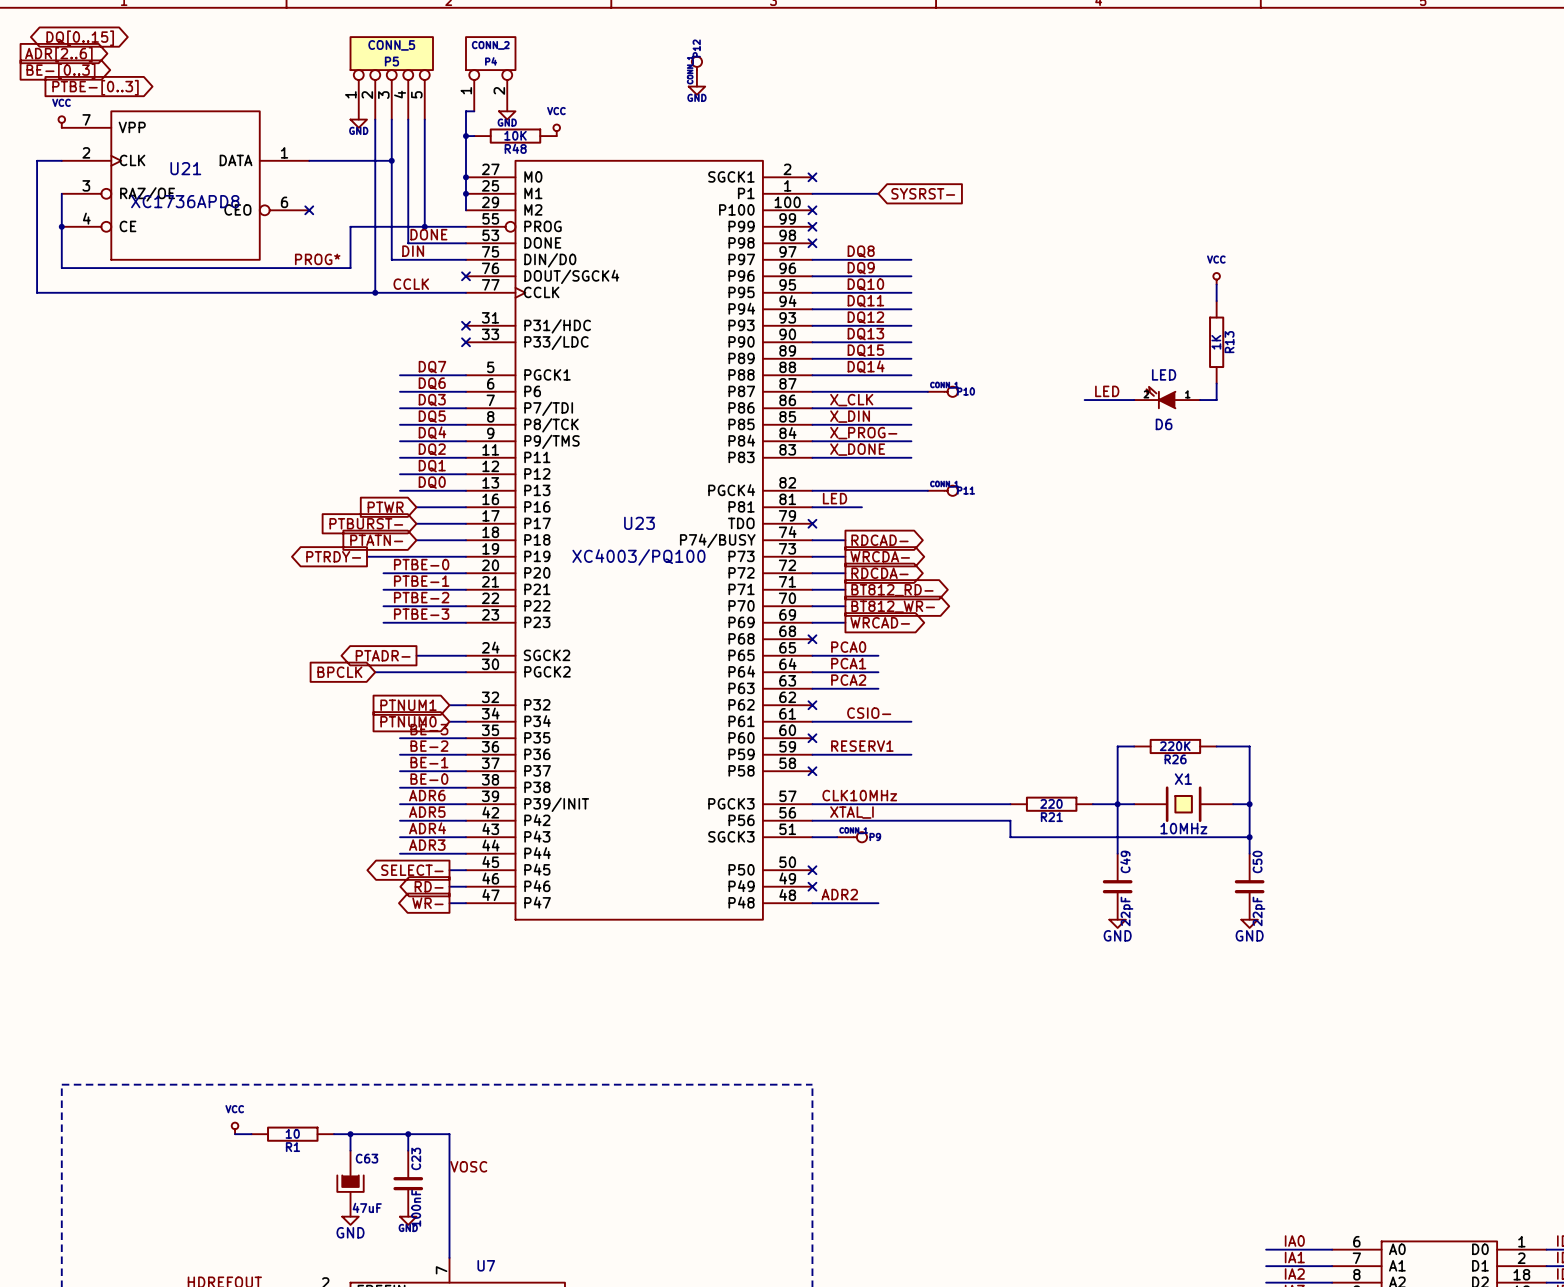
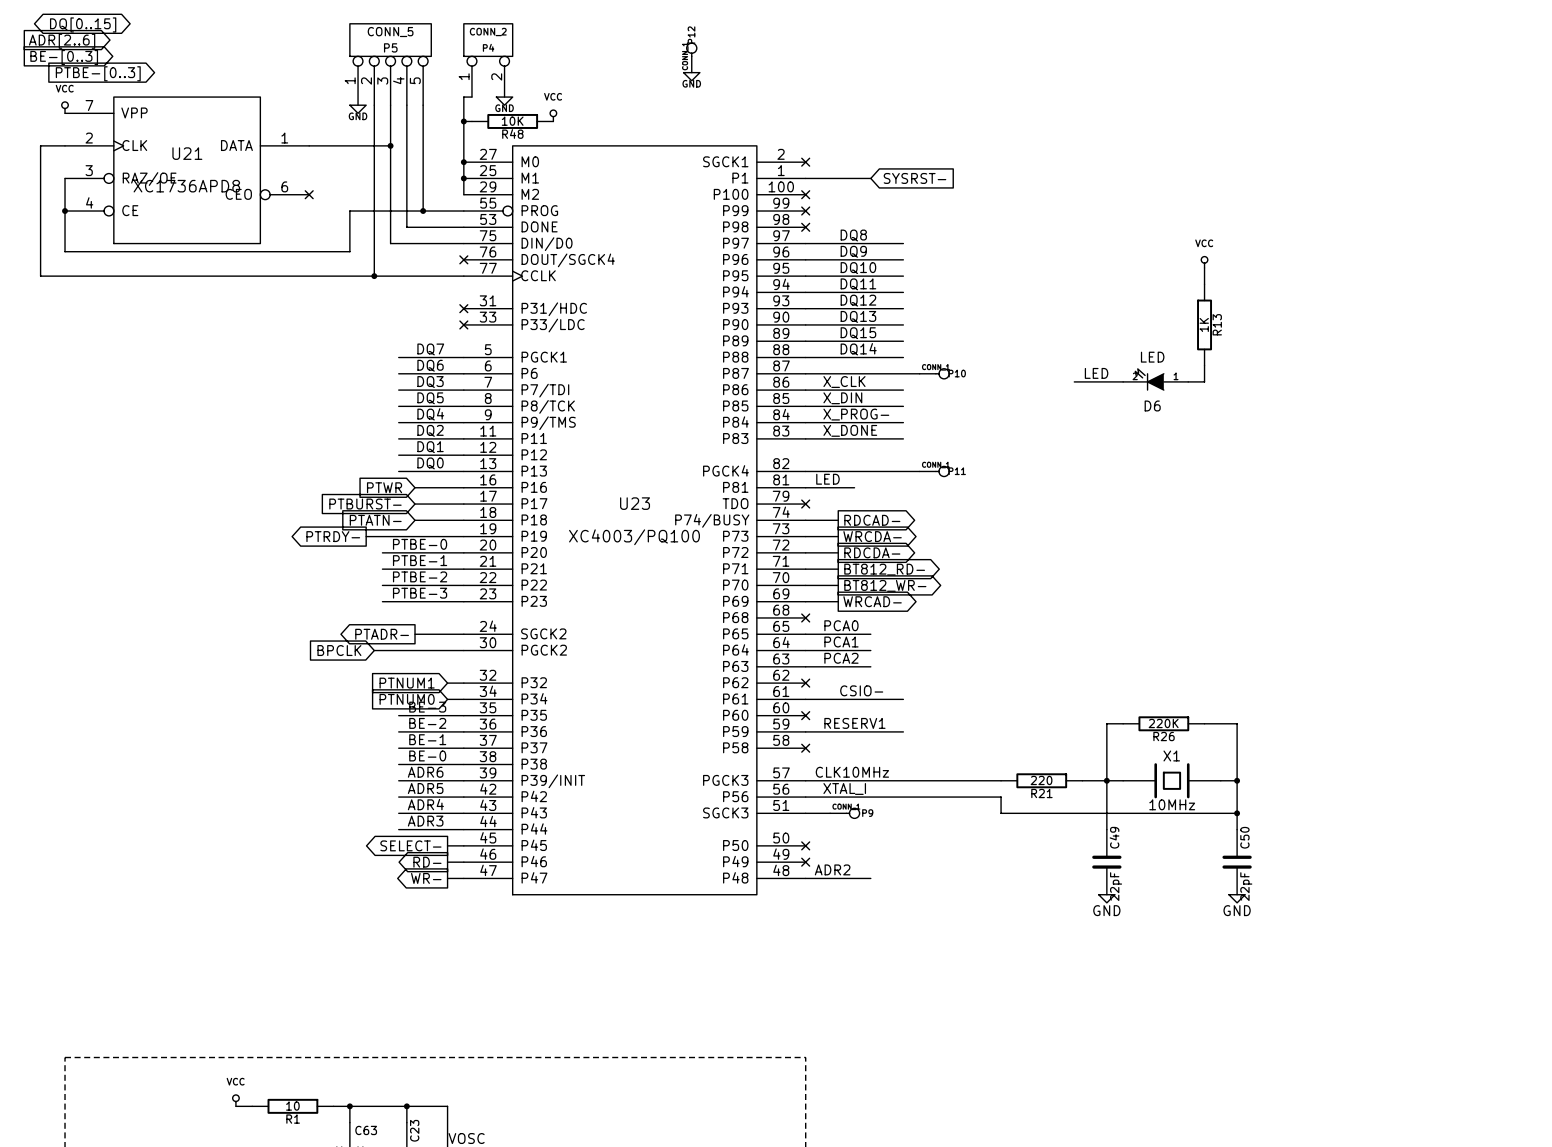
label: DONE (428, 234) -> none
label: DIN (413, 251) -> none
label: PROG* (317, 259) -> none
label: CCLK (411, 284) -> none

